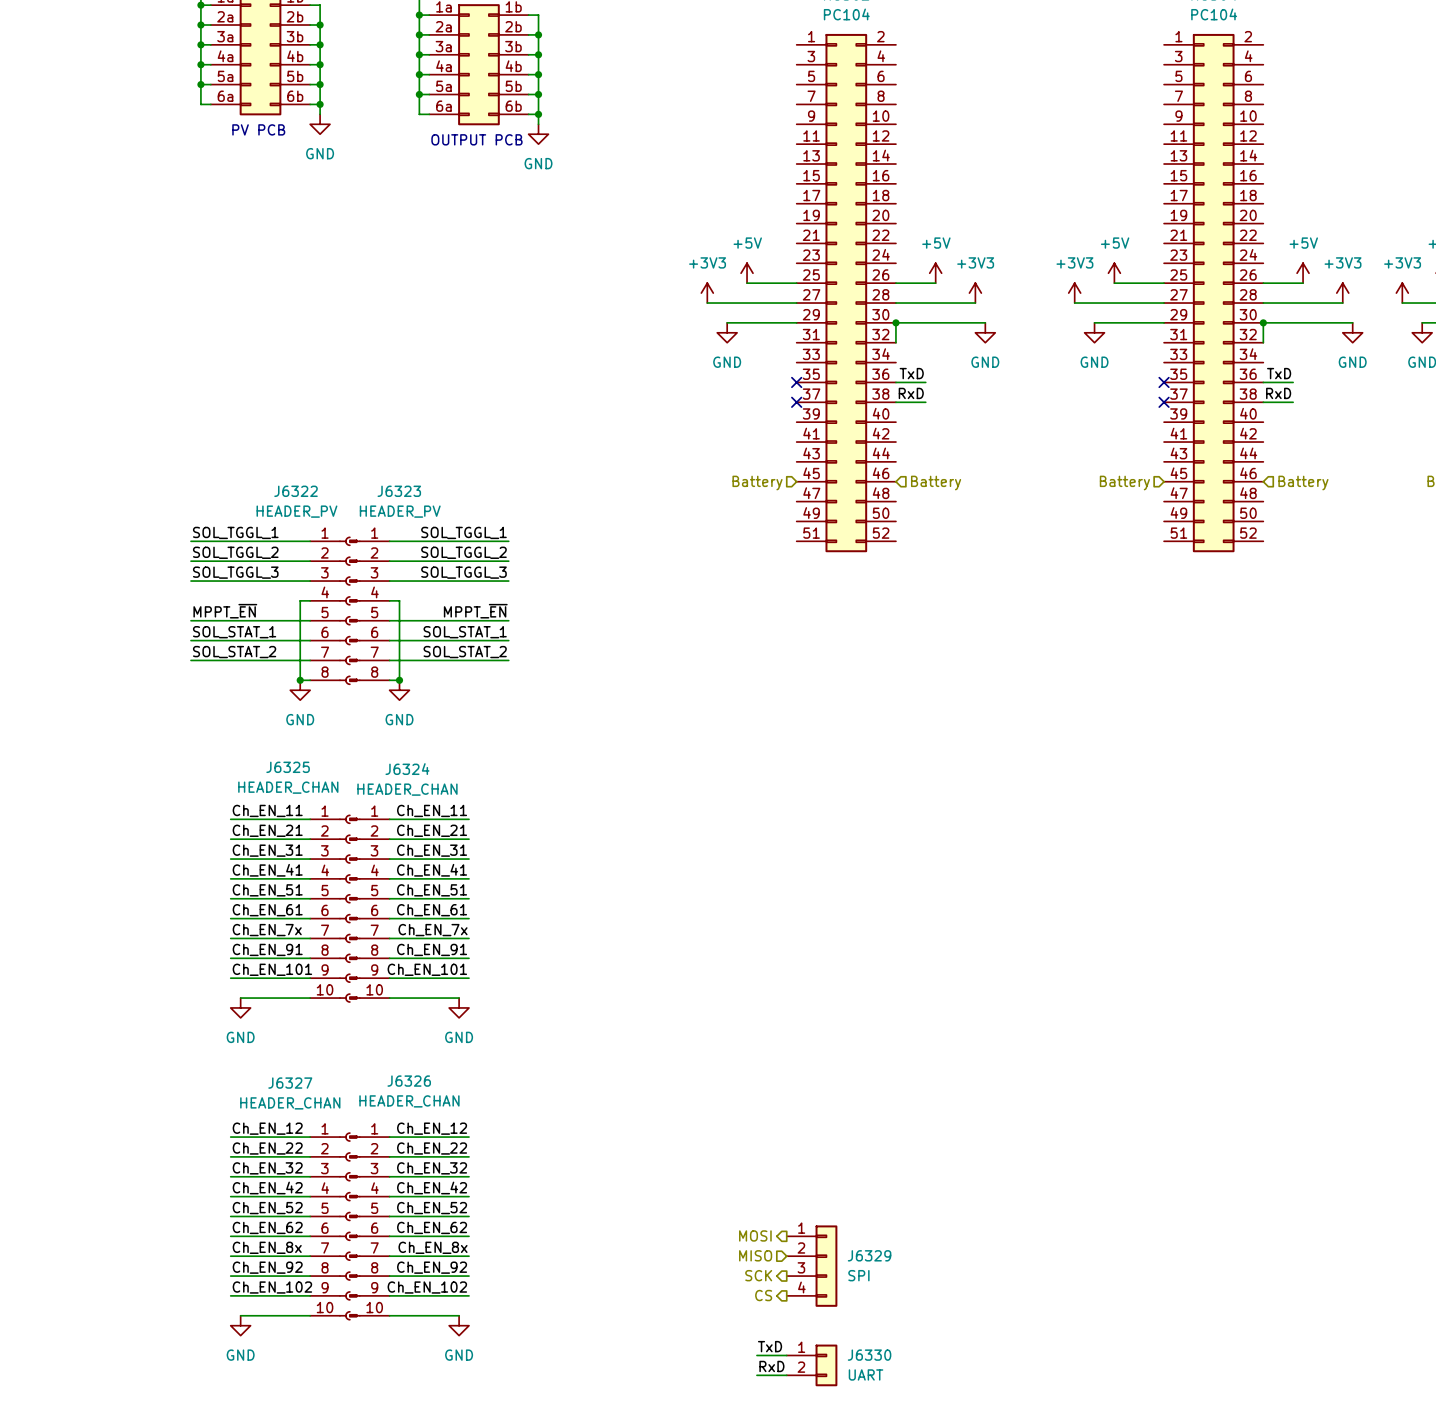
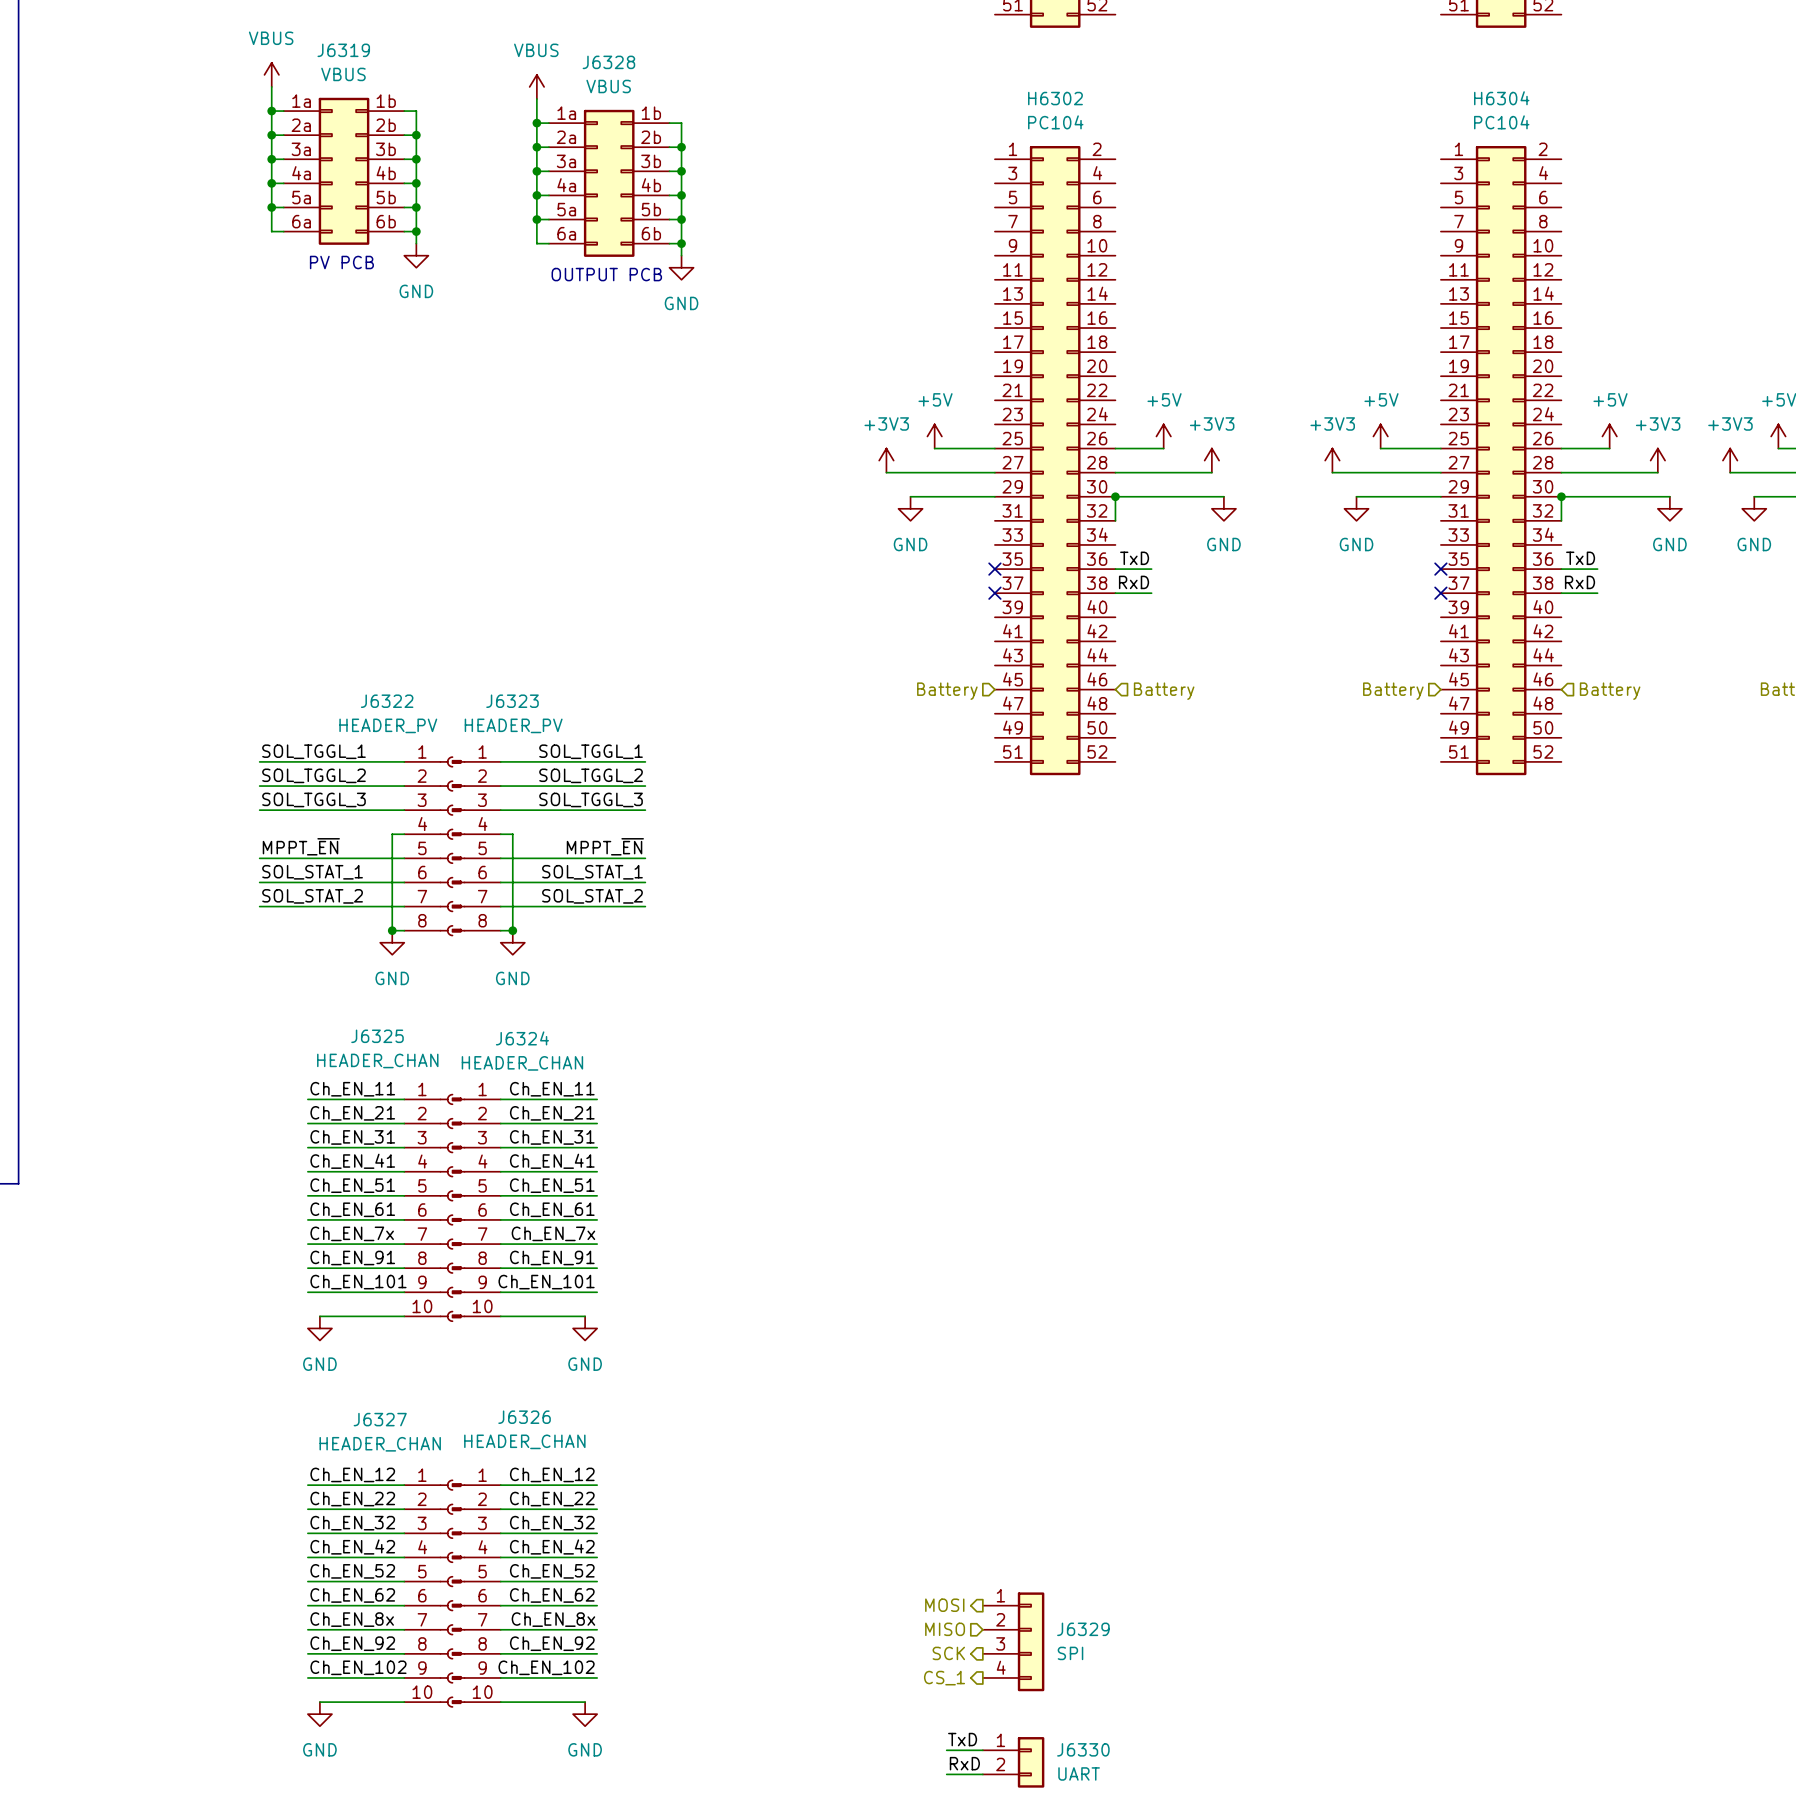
hierarchical label: CS (763, 1295) -> CS_1 (944, 1678)

